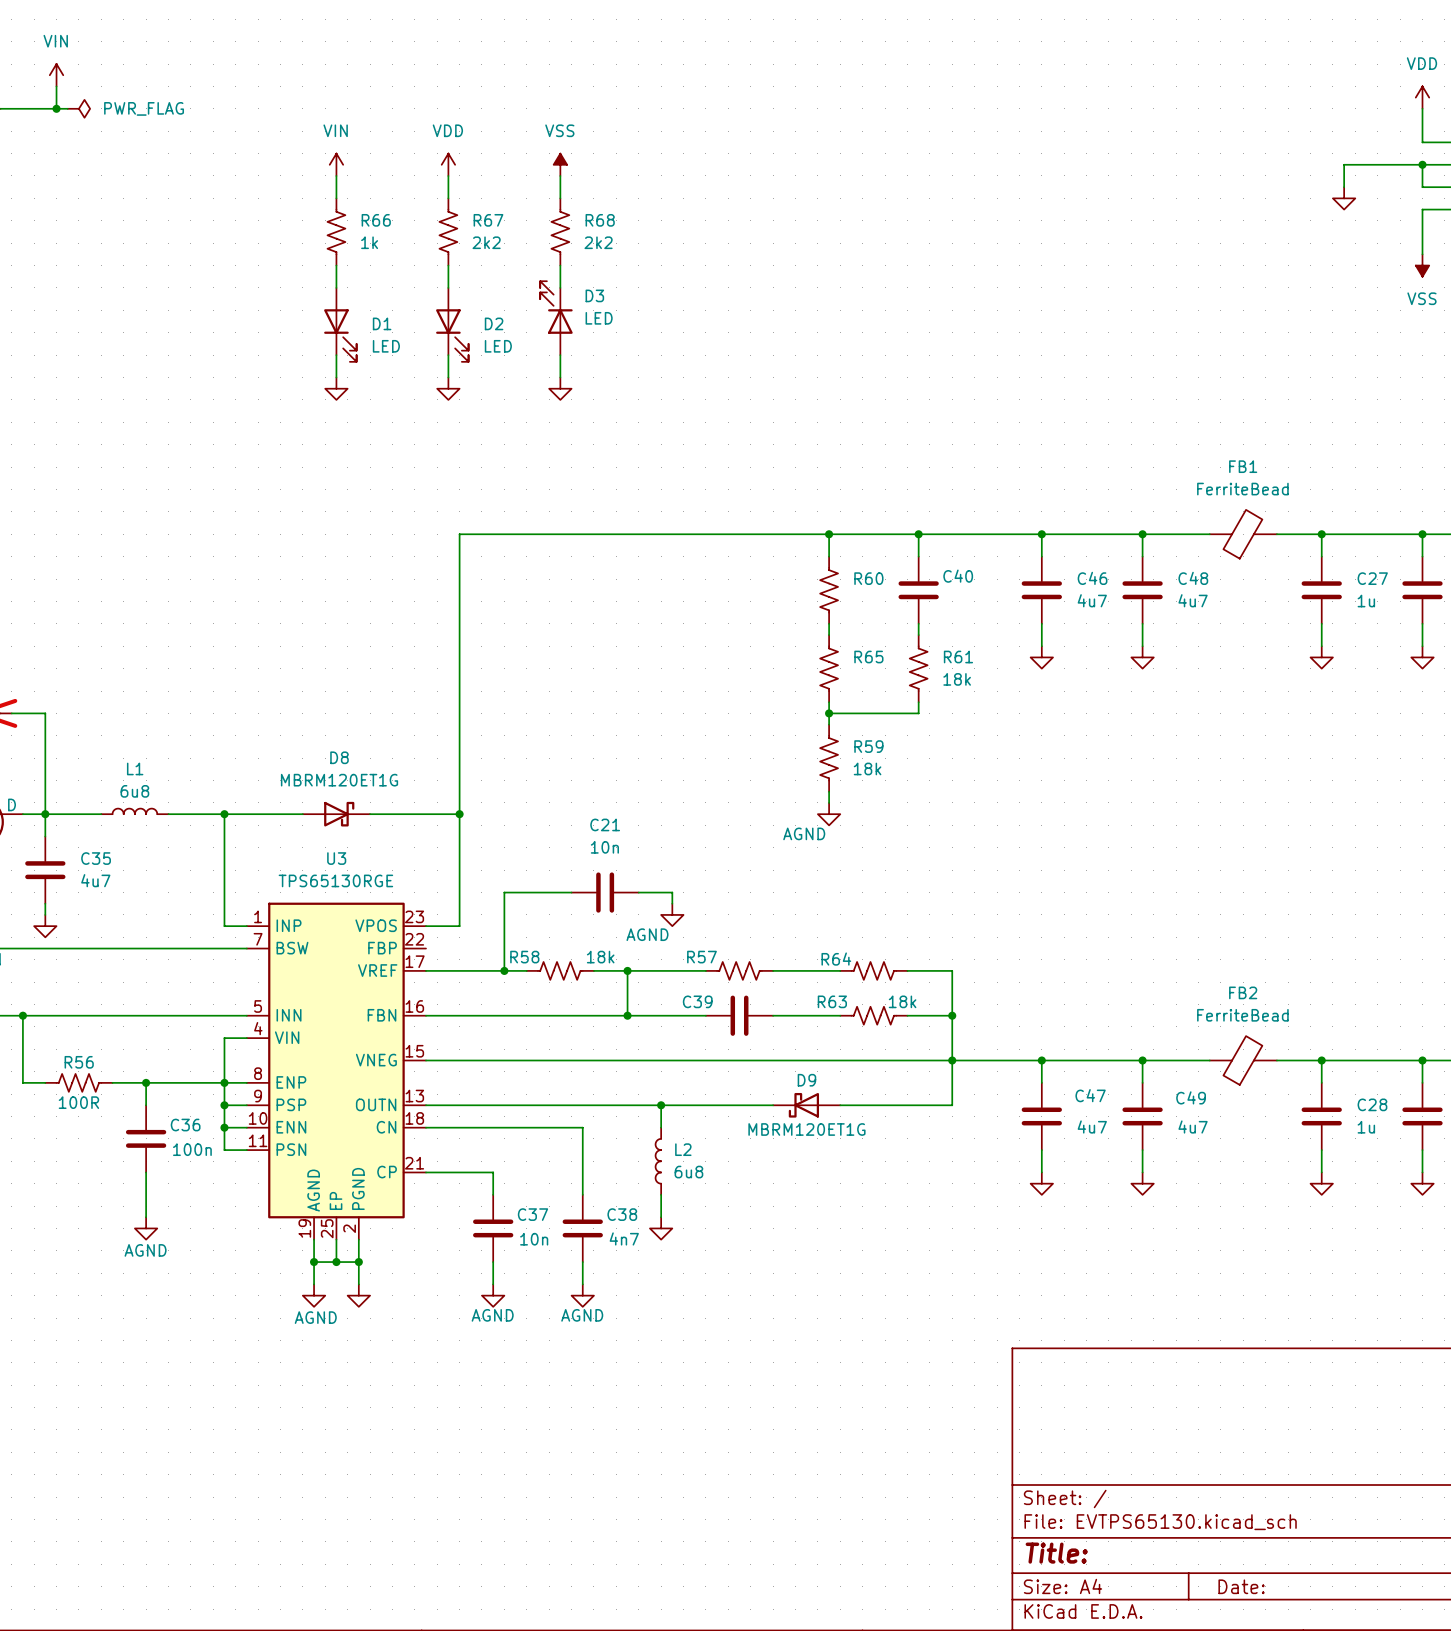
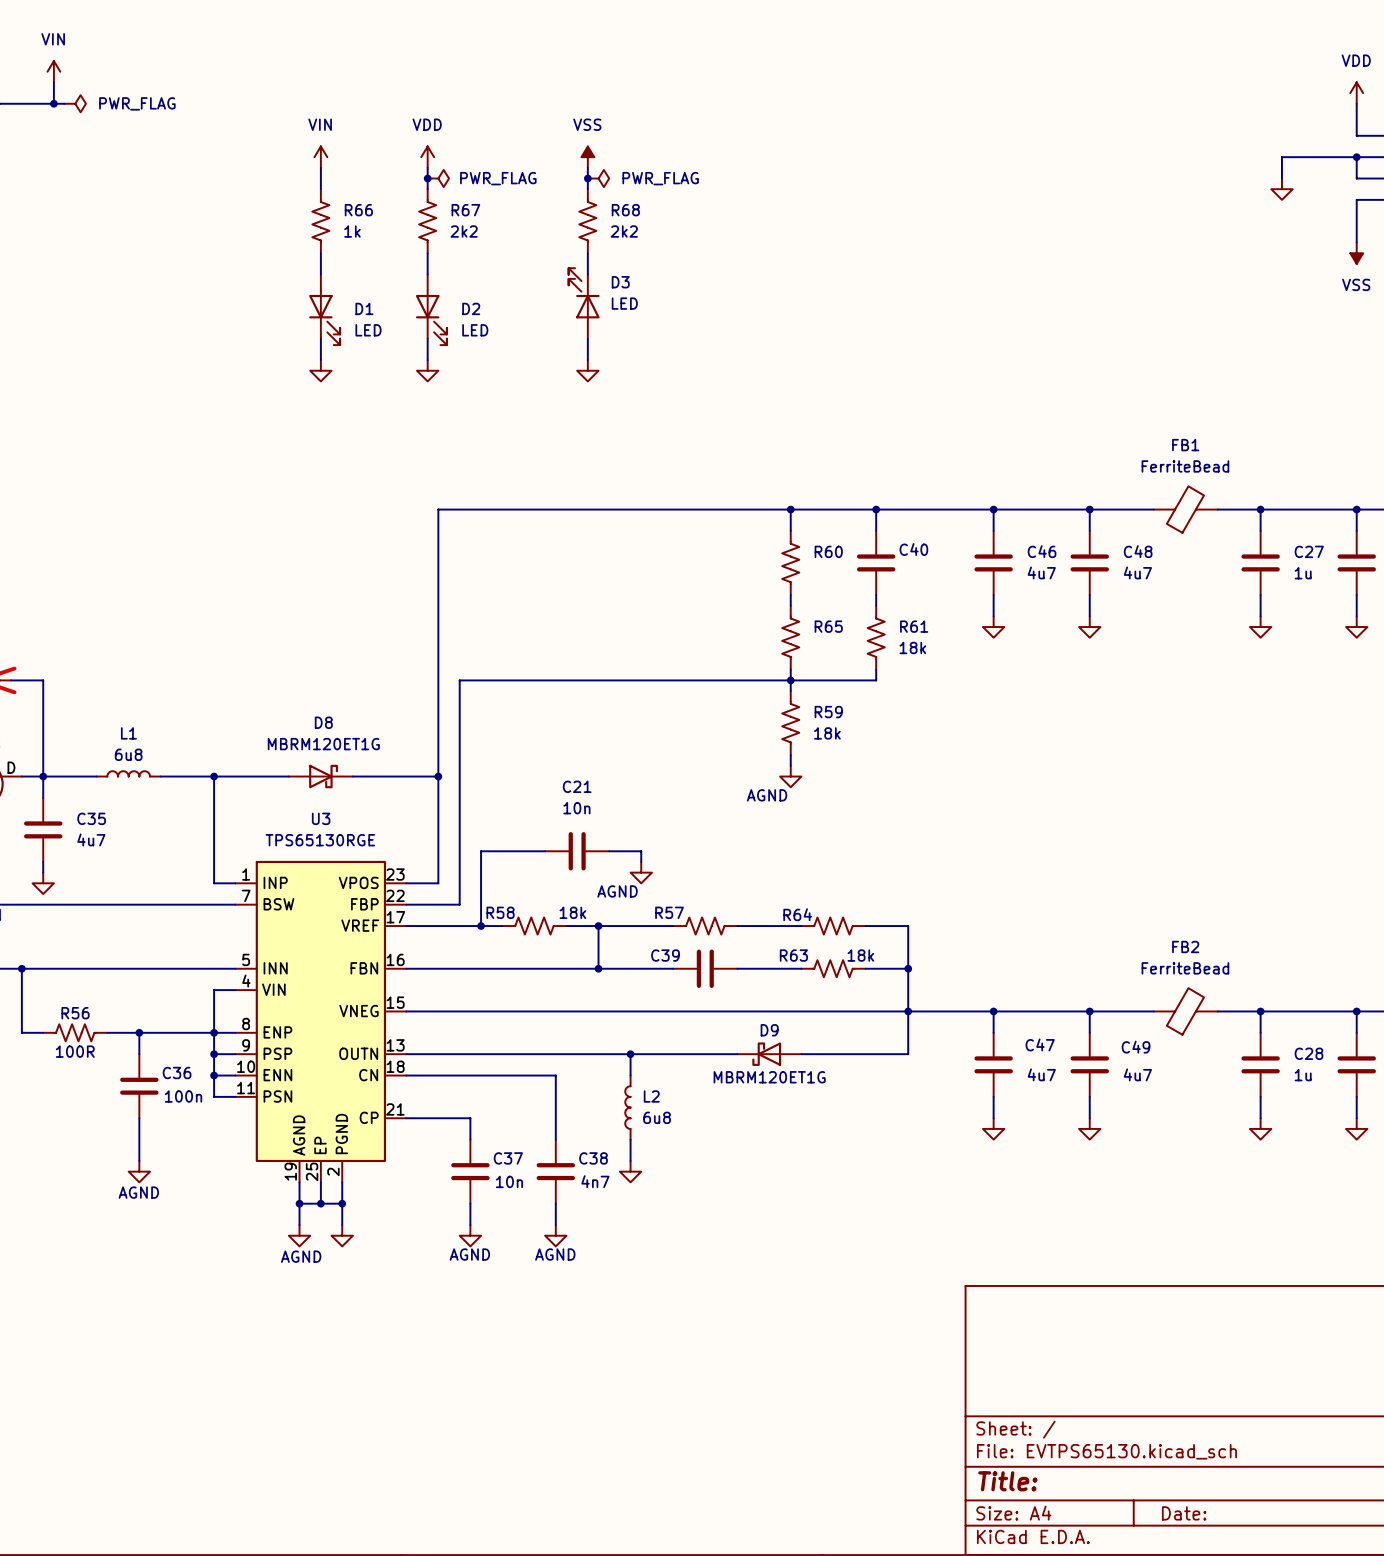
power symbol position: VSS (560, 164) -> VSS (587, 157)
wire: (560, 175) (560, 198) -> (587, 167) (587, 189)
junction: none -> (427, 178)
power symbol: none -> PWR_FLAG (438, 178)
junction: none -> (587, 178)
power symbol: none -> PWR_FLAG (598, 178)
R68 position: (560, 231) -> (587, 221)
wire: (560, 265) (560, 287) -> (587, 253) (587, 274)
D3 position: (556, 318) -> (584, 303)
wire: (560, 355) (560, 377) -> (587, 338) (587, 360)
power symbol position: (560, 388) -> (587, 370)
wire: none -> (790, 680) (459, 680) (459, 904) (406, 904)

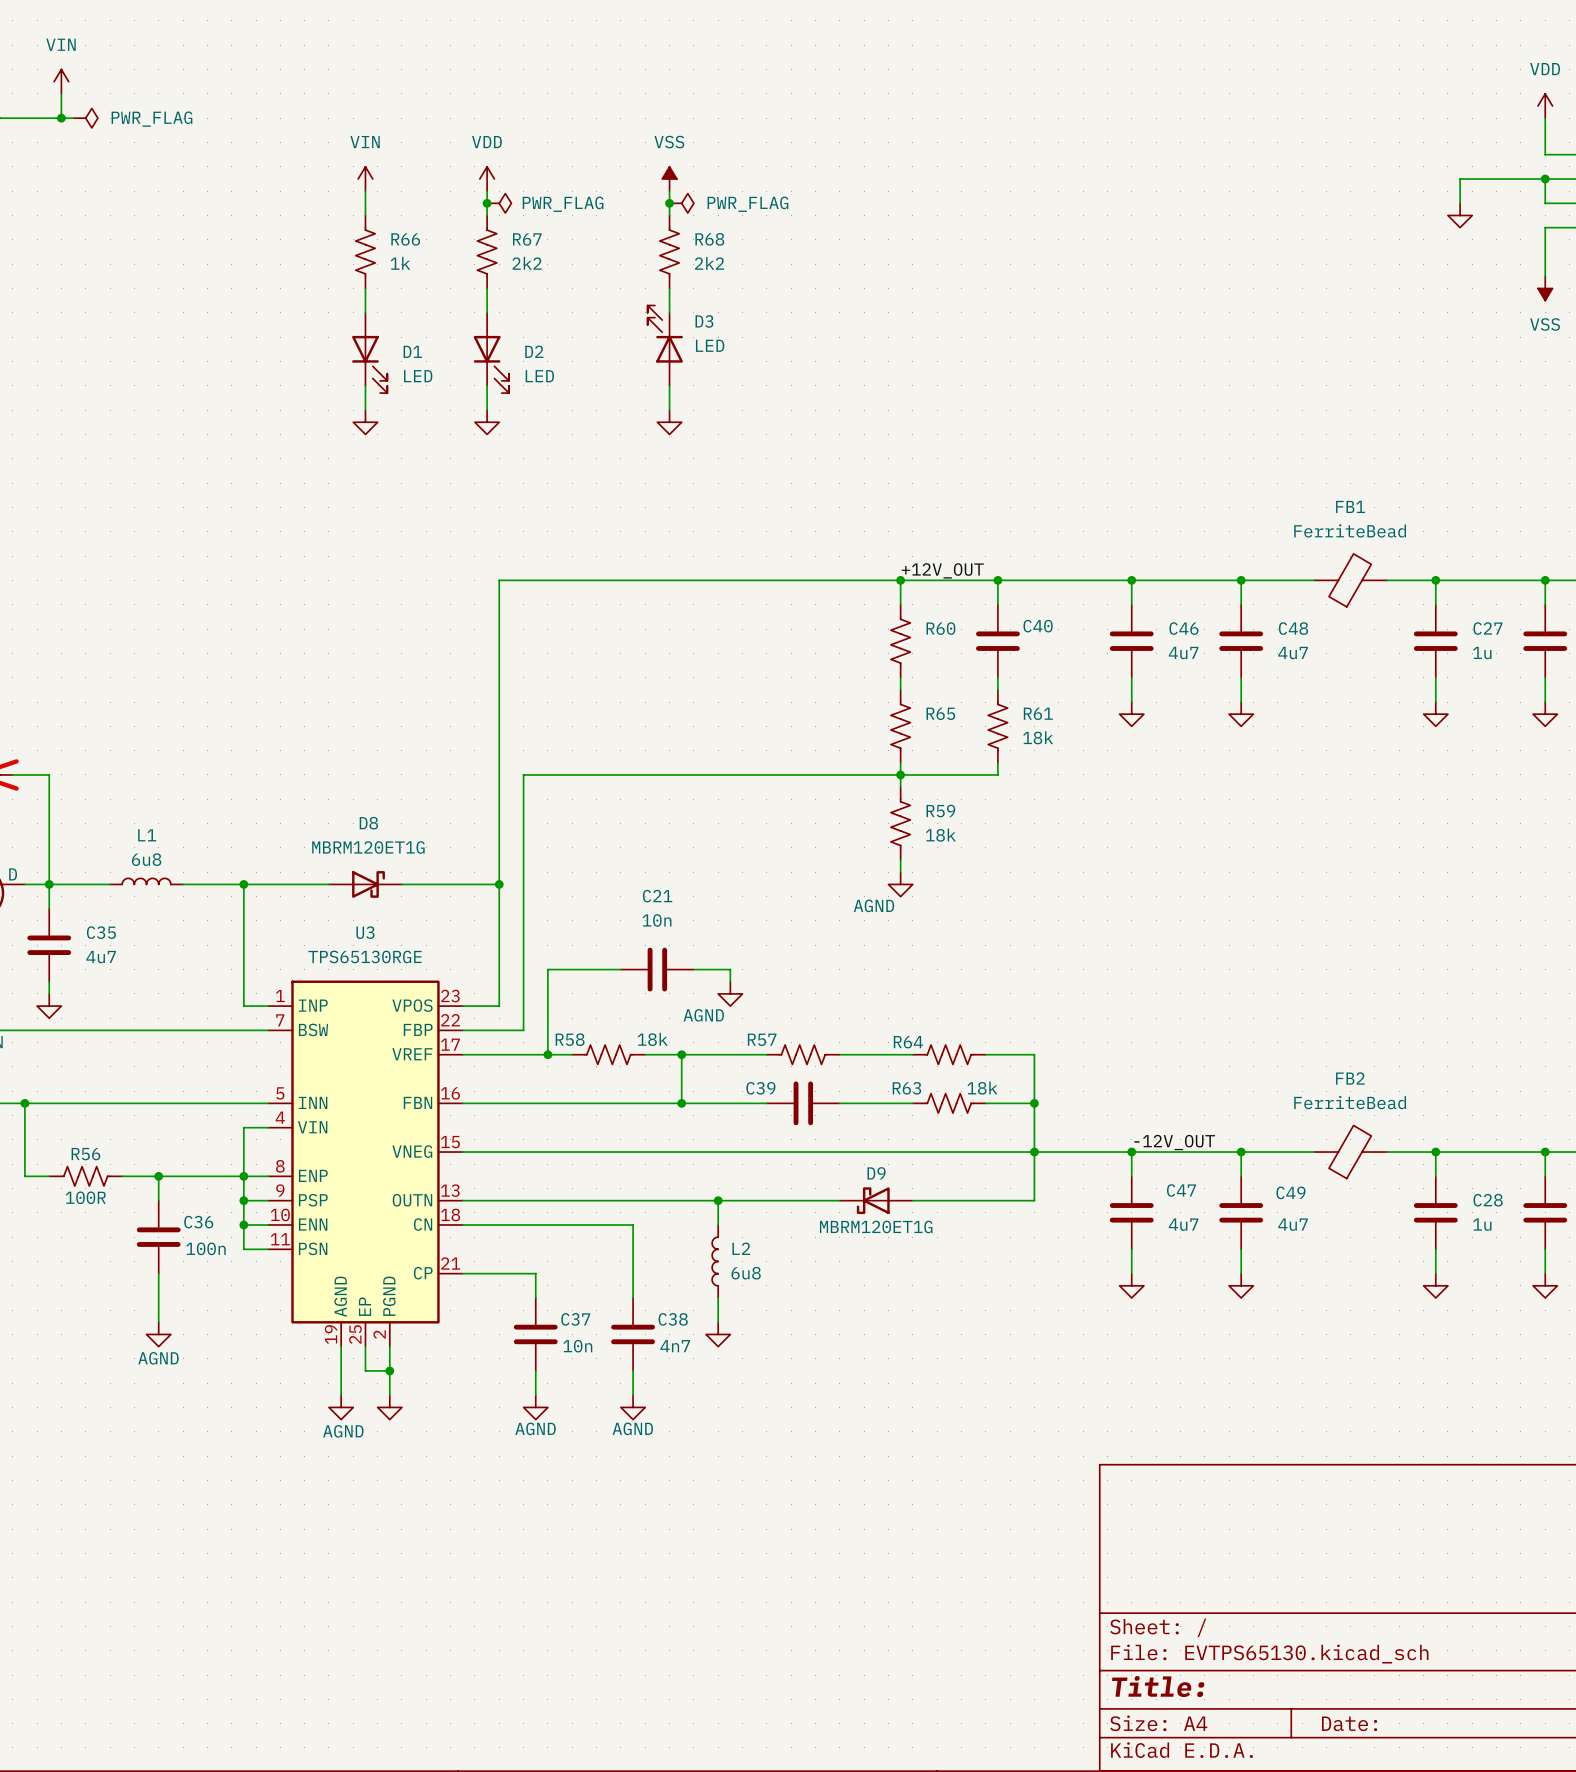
label: none -> +12V_OUT (942, 570)
label: none -> -12V_OUT (1174, 1142)
wire: (299, 1203) (320, 1203) -> none
junction: (299, 1203) -> none
junction: (320, 1203) -> none

